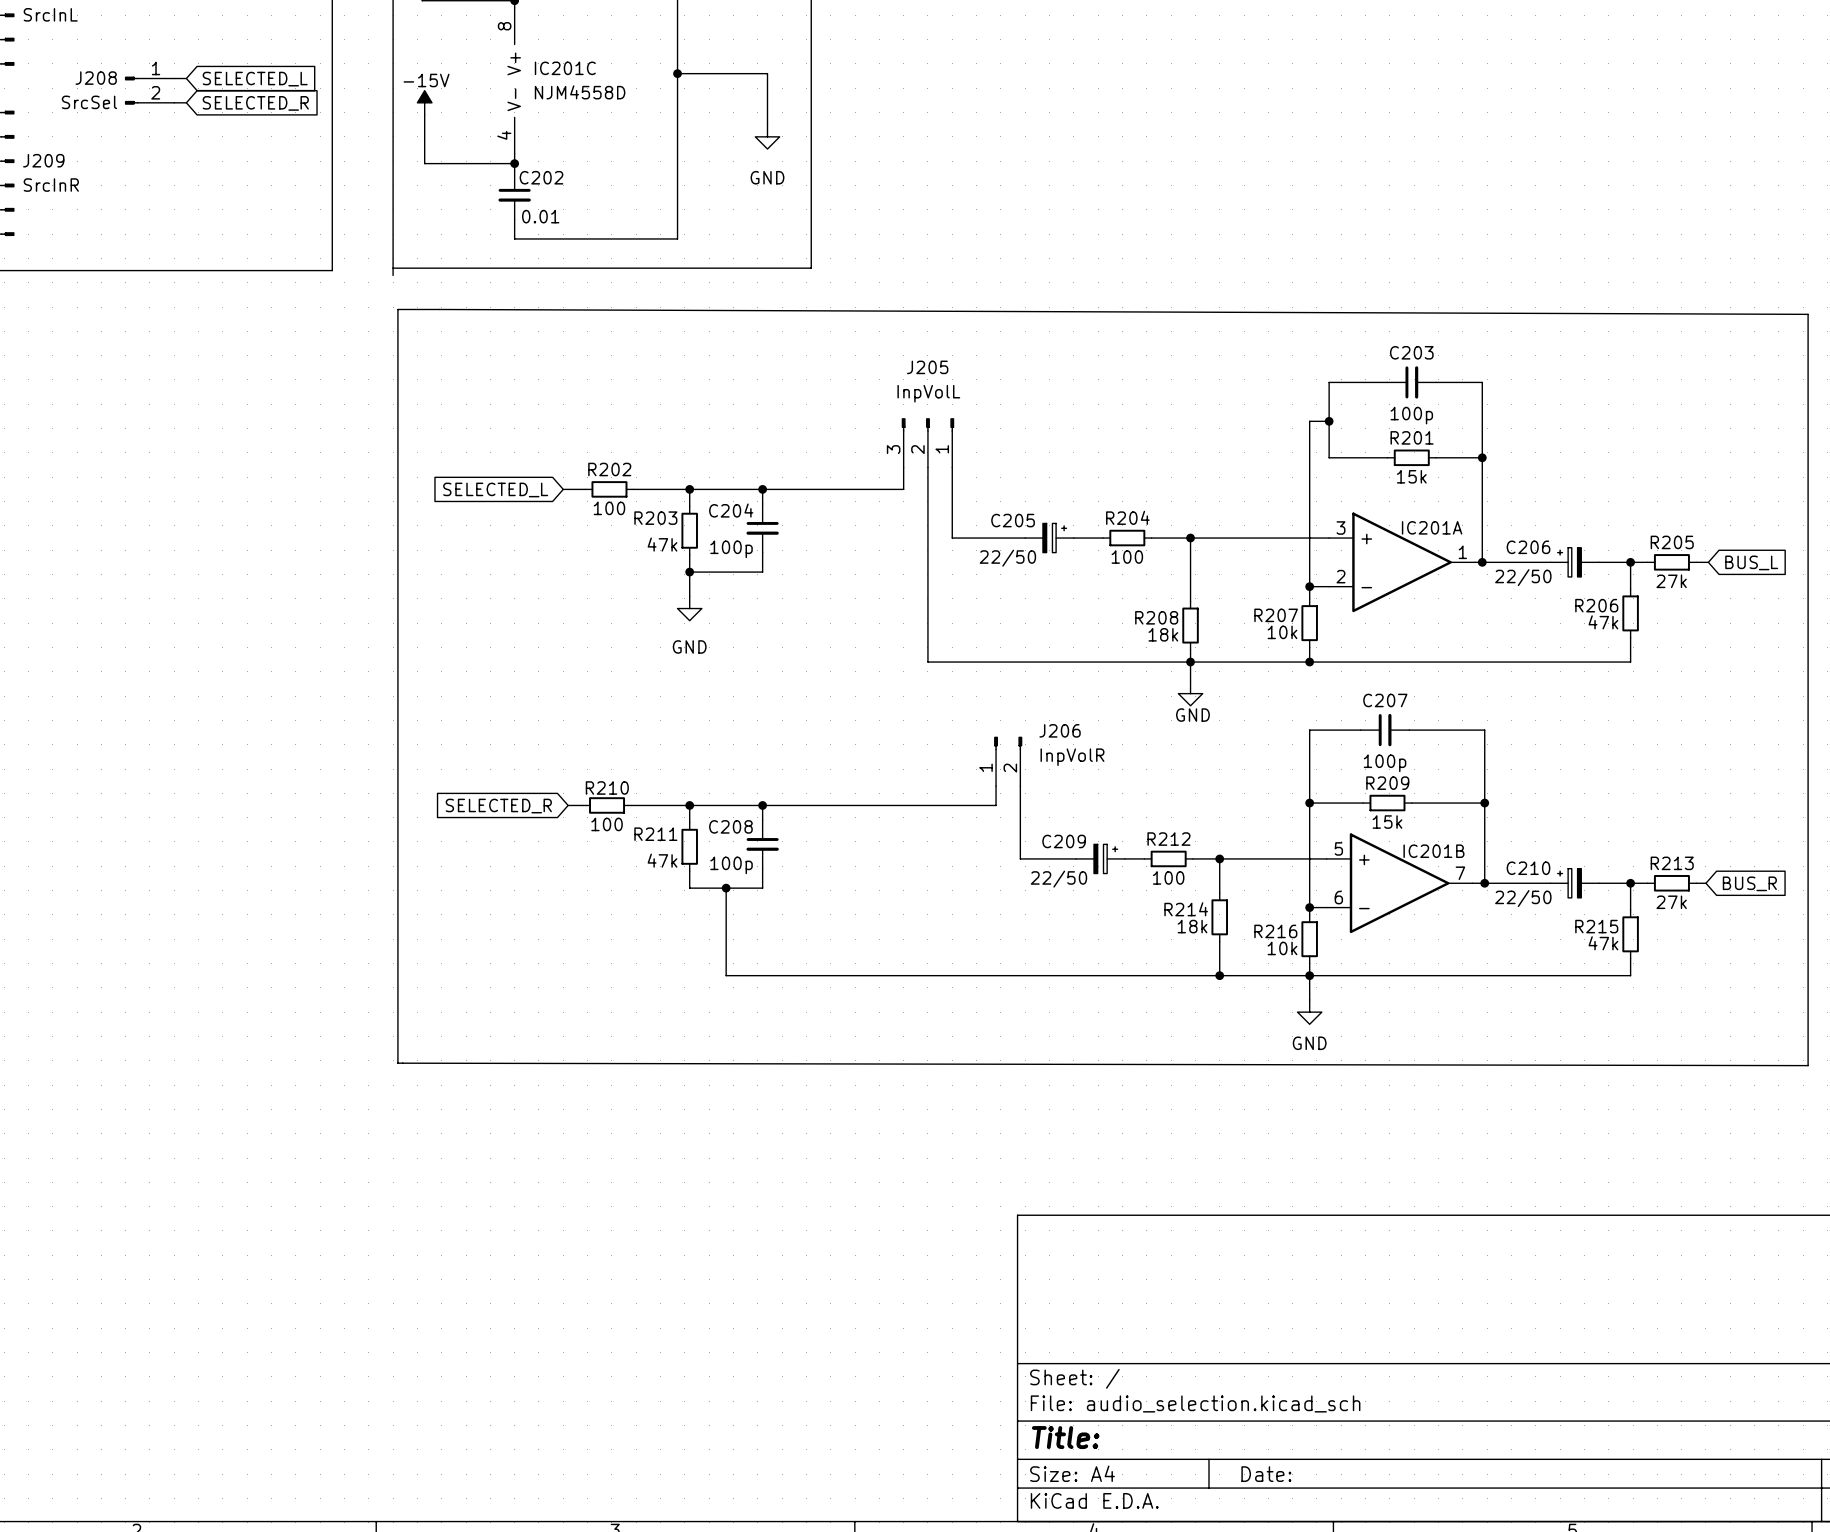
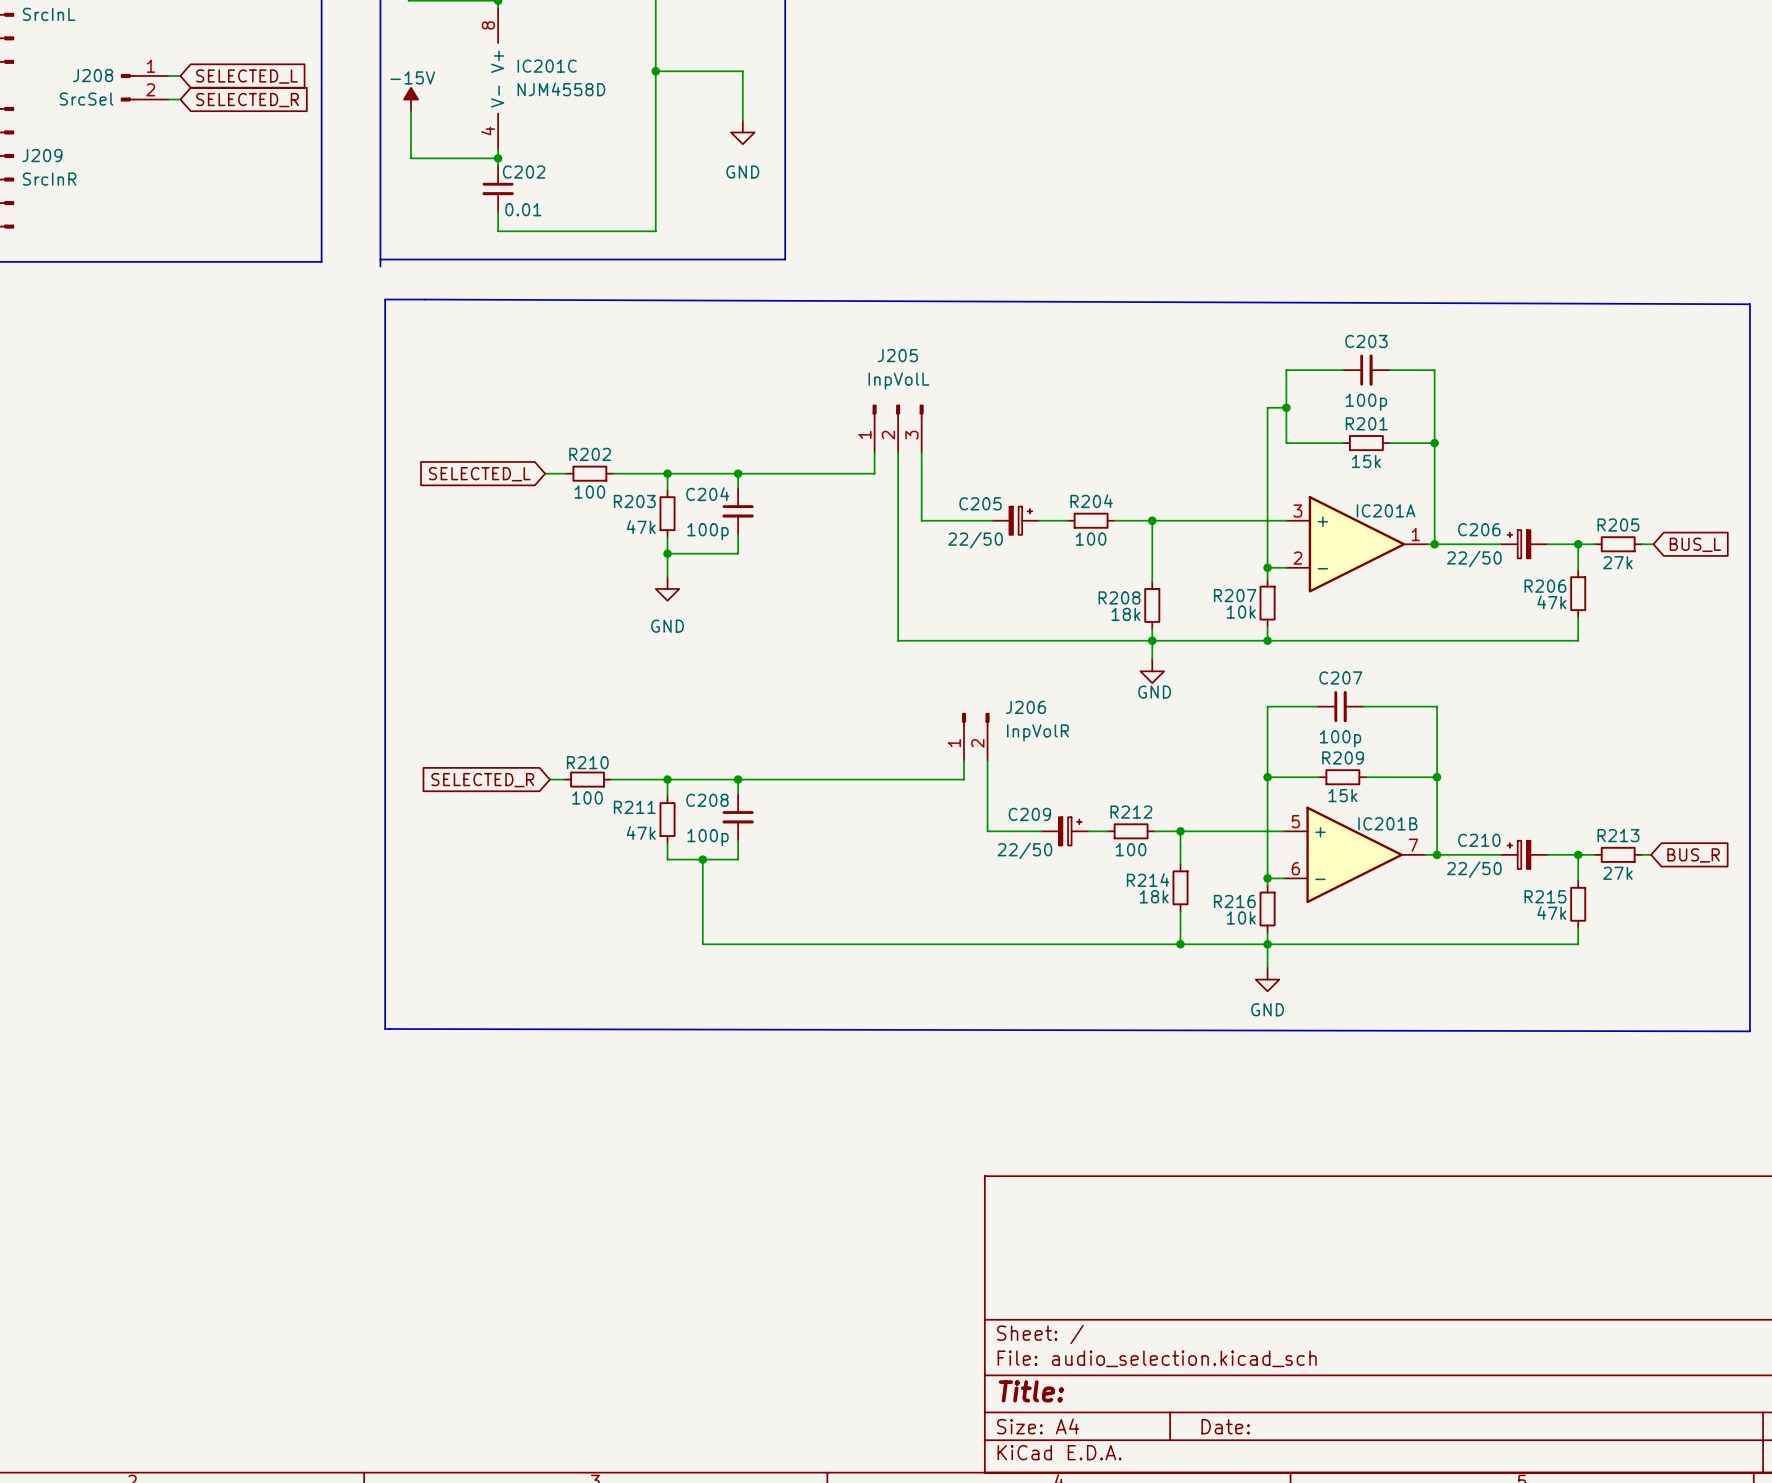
J205 flip: as is (927, 424) -> left-right (898, 411)

